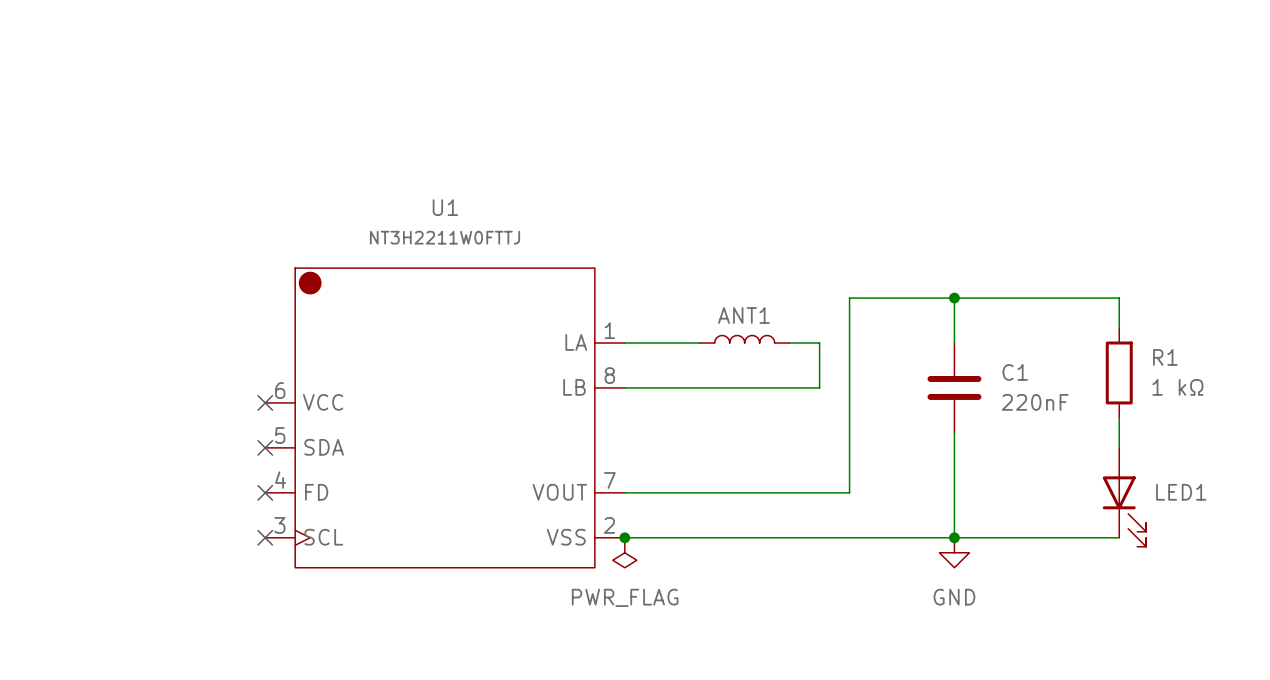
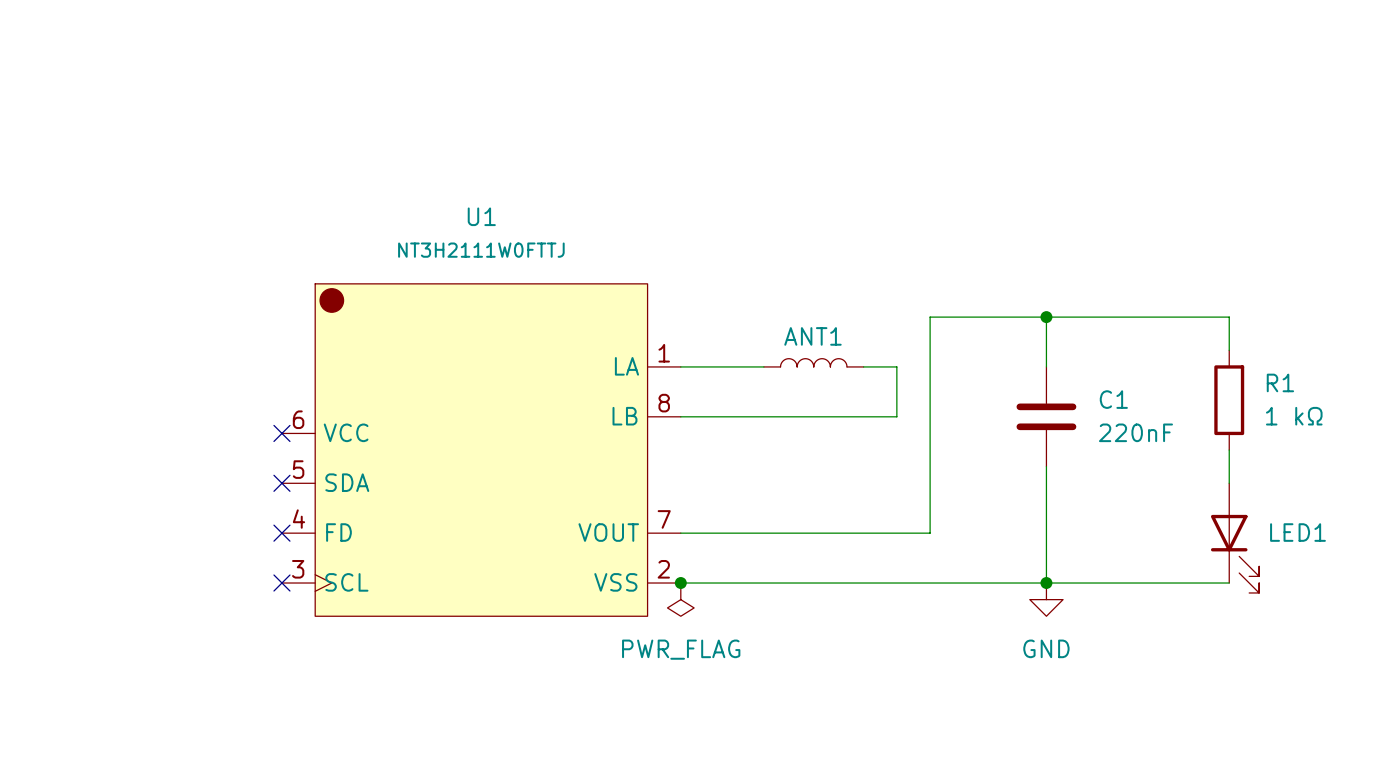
U1 value: NT3H2211W0FTTJ (445, 237) -> NT3H2111W0FTTJ (481, 250)

